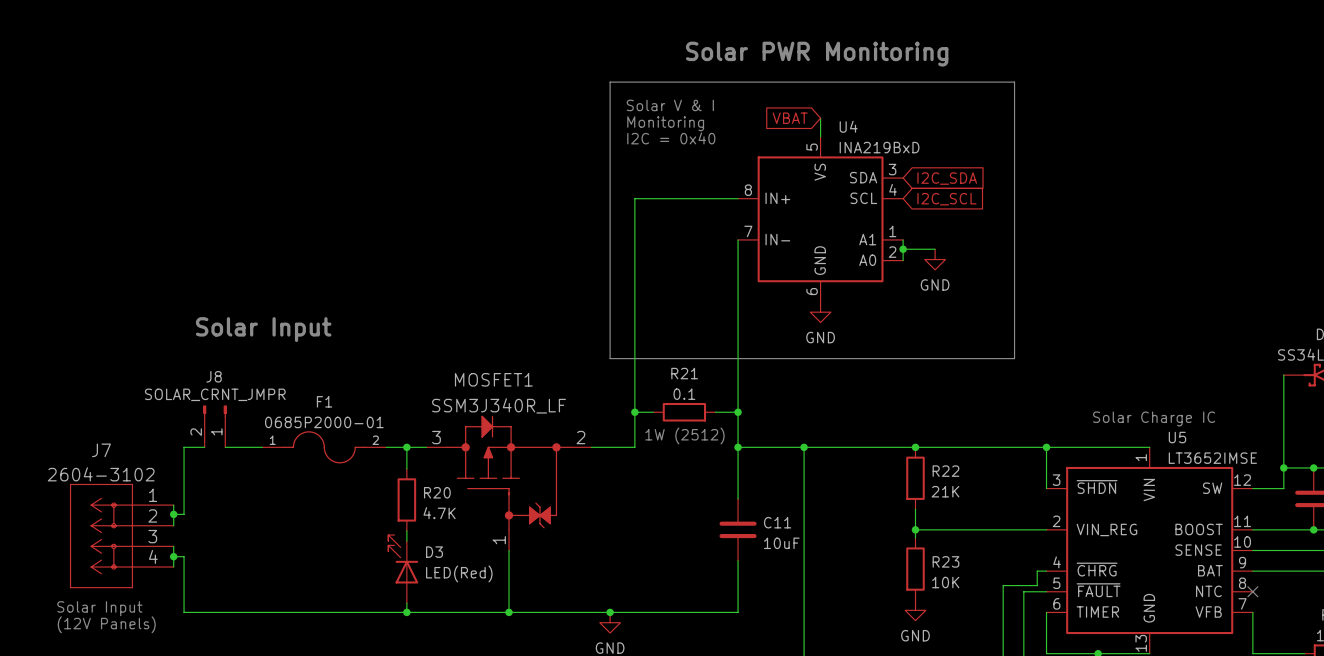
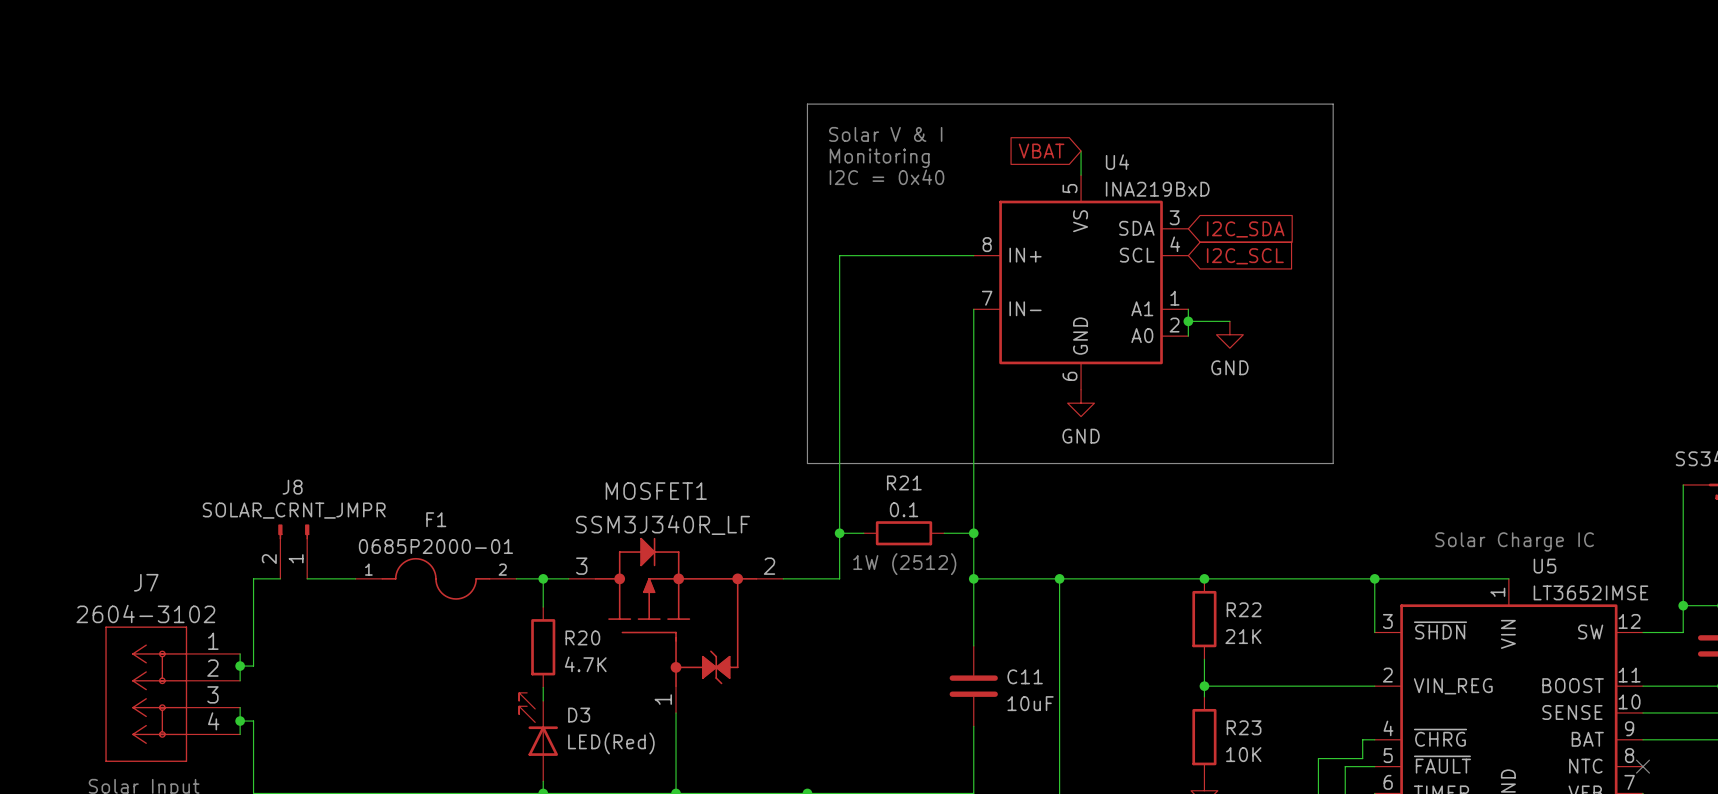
text: Solar PWR Monitoring (817, 54) -> none
text: Solar Input (263, 329) -> none

